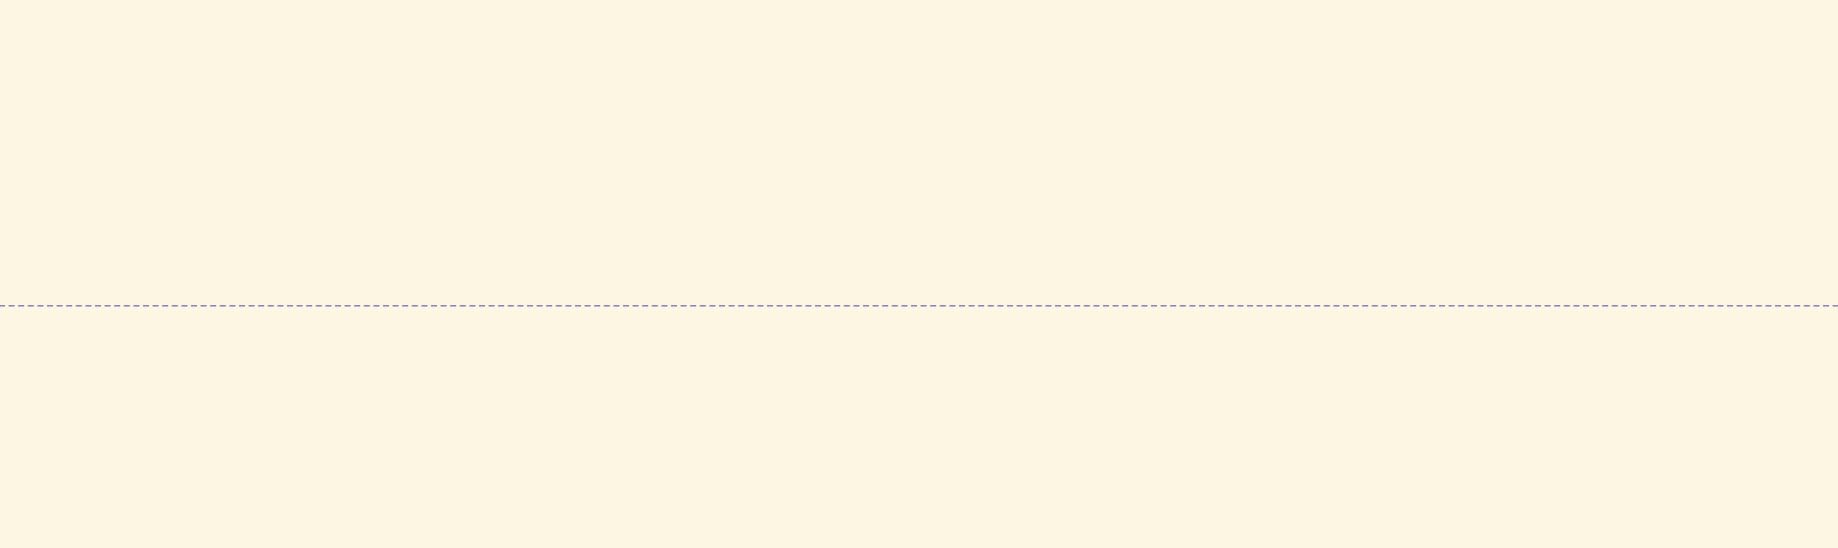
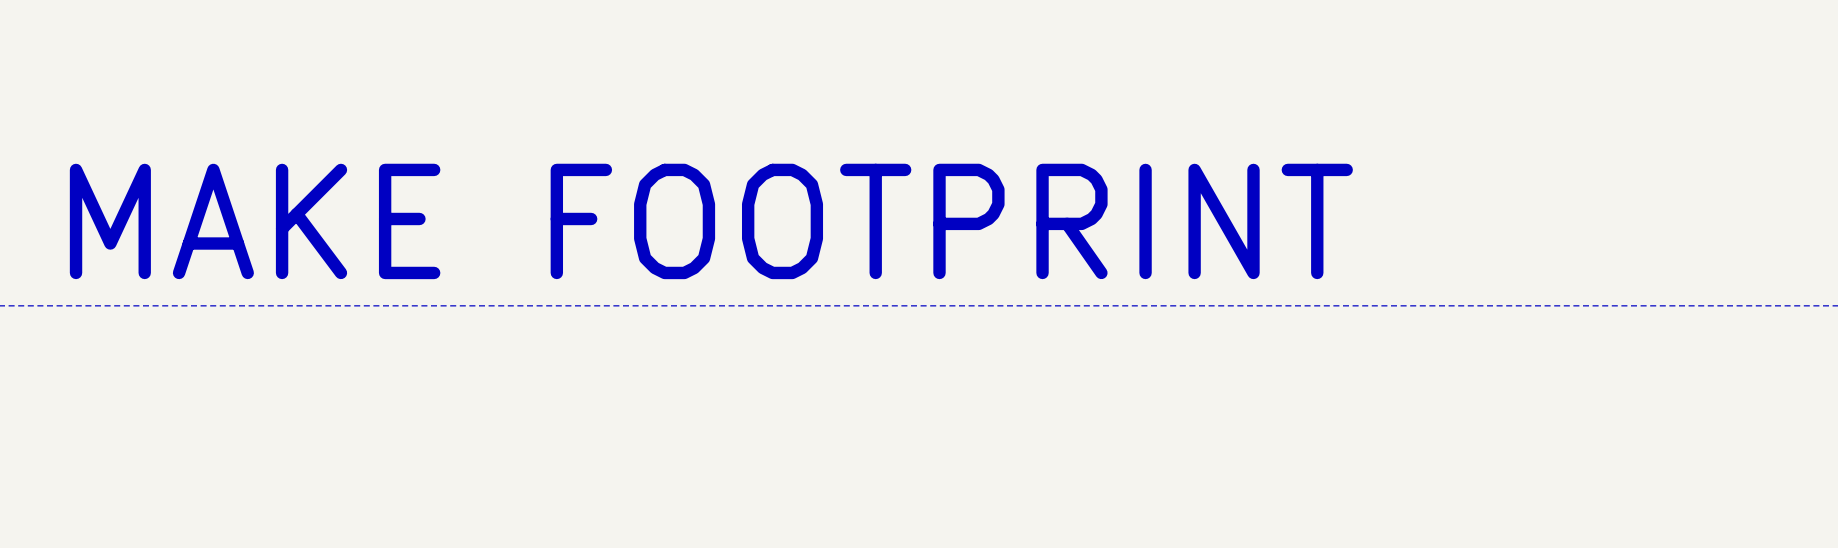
text: none -> MAKE FOOTPRINT (711, 221)

